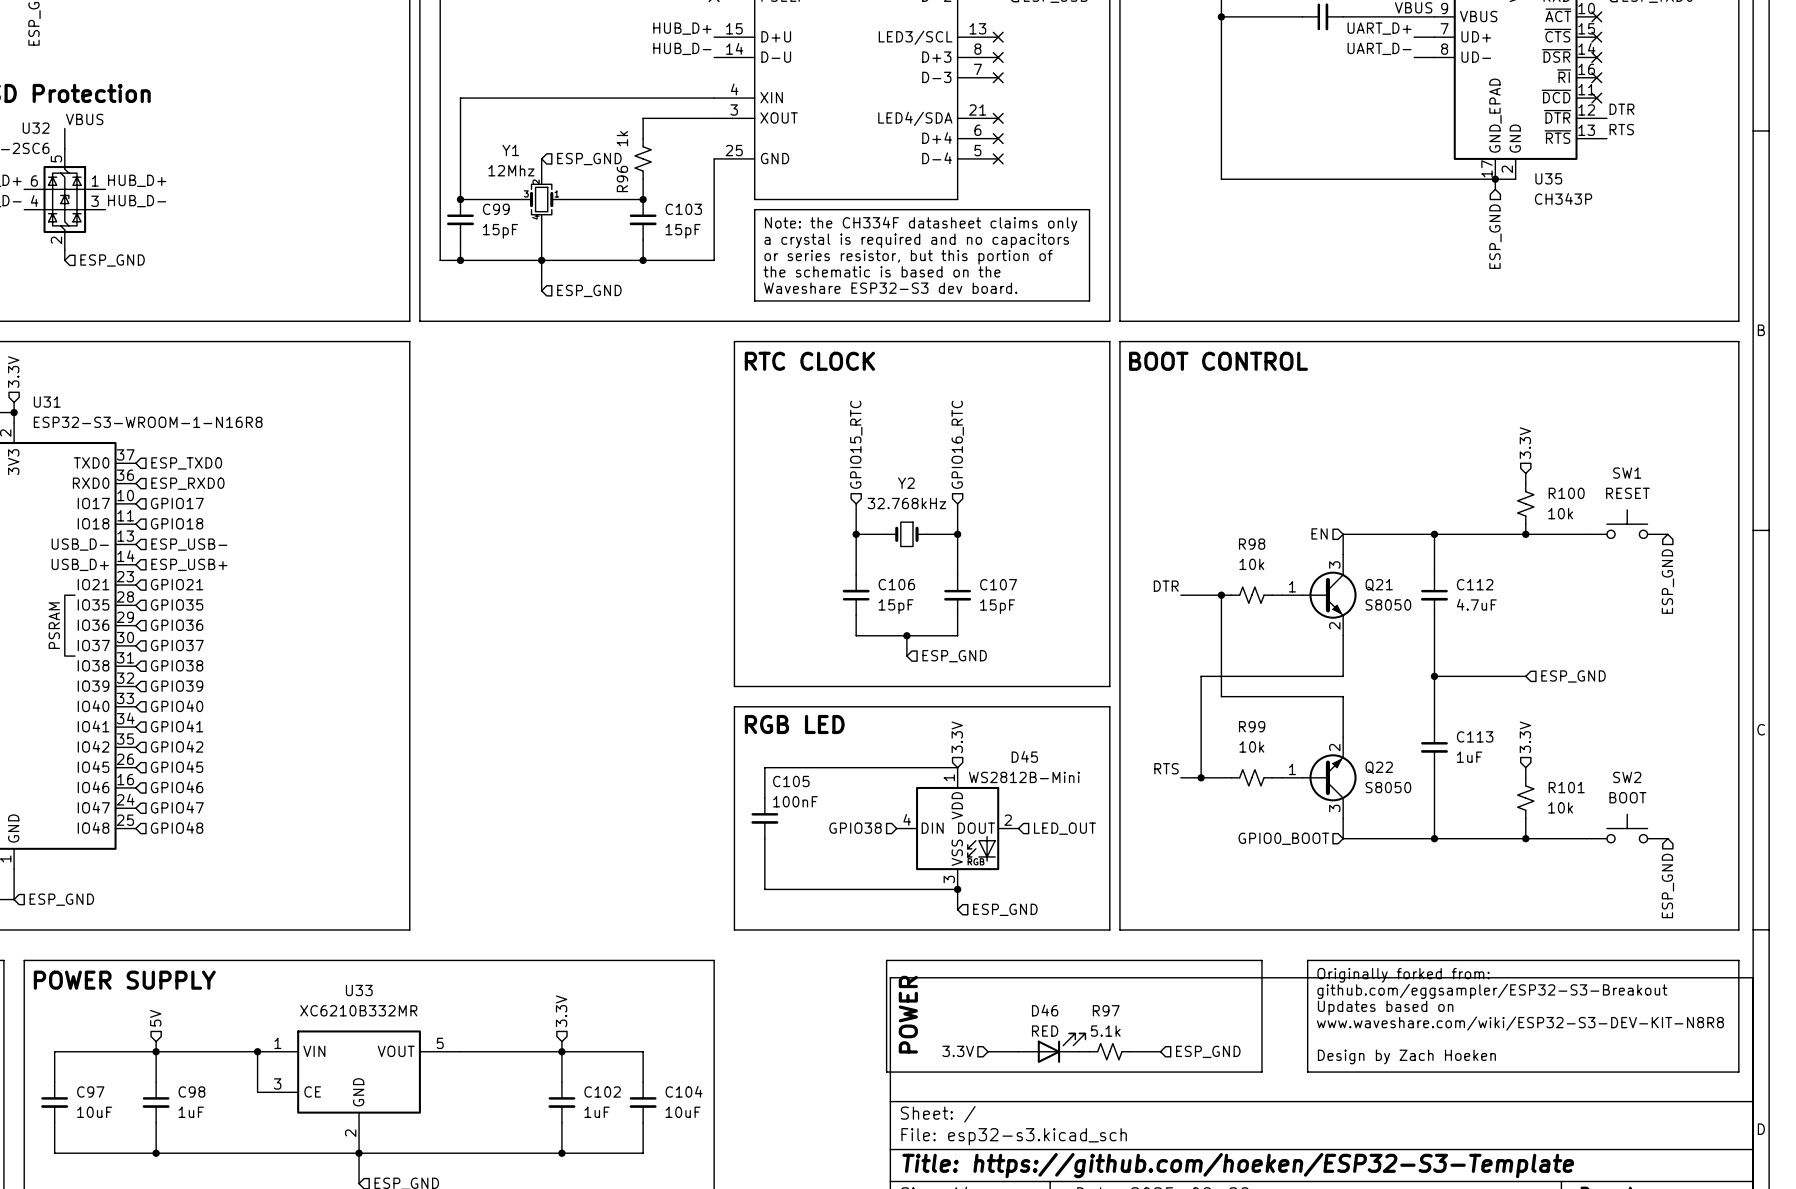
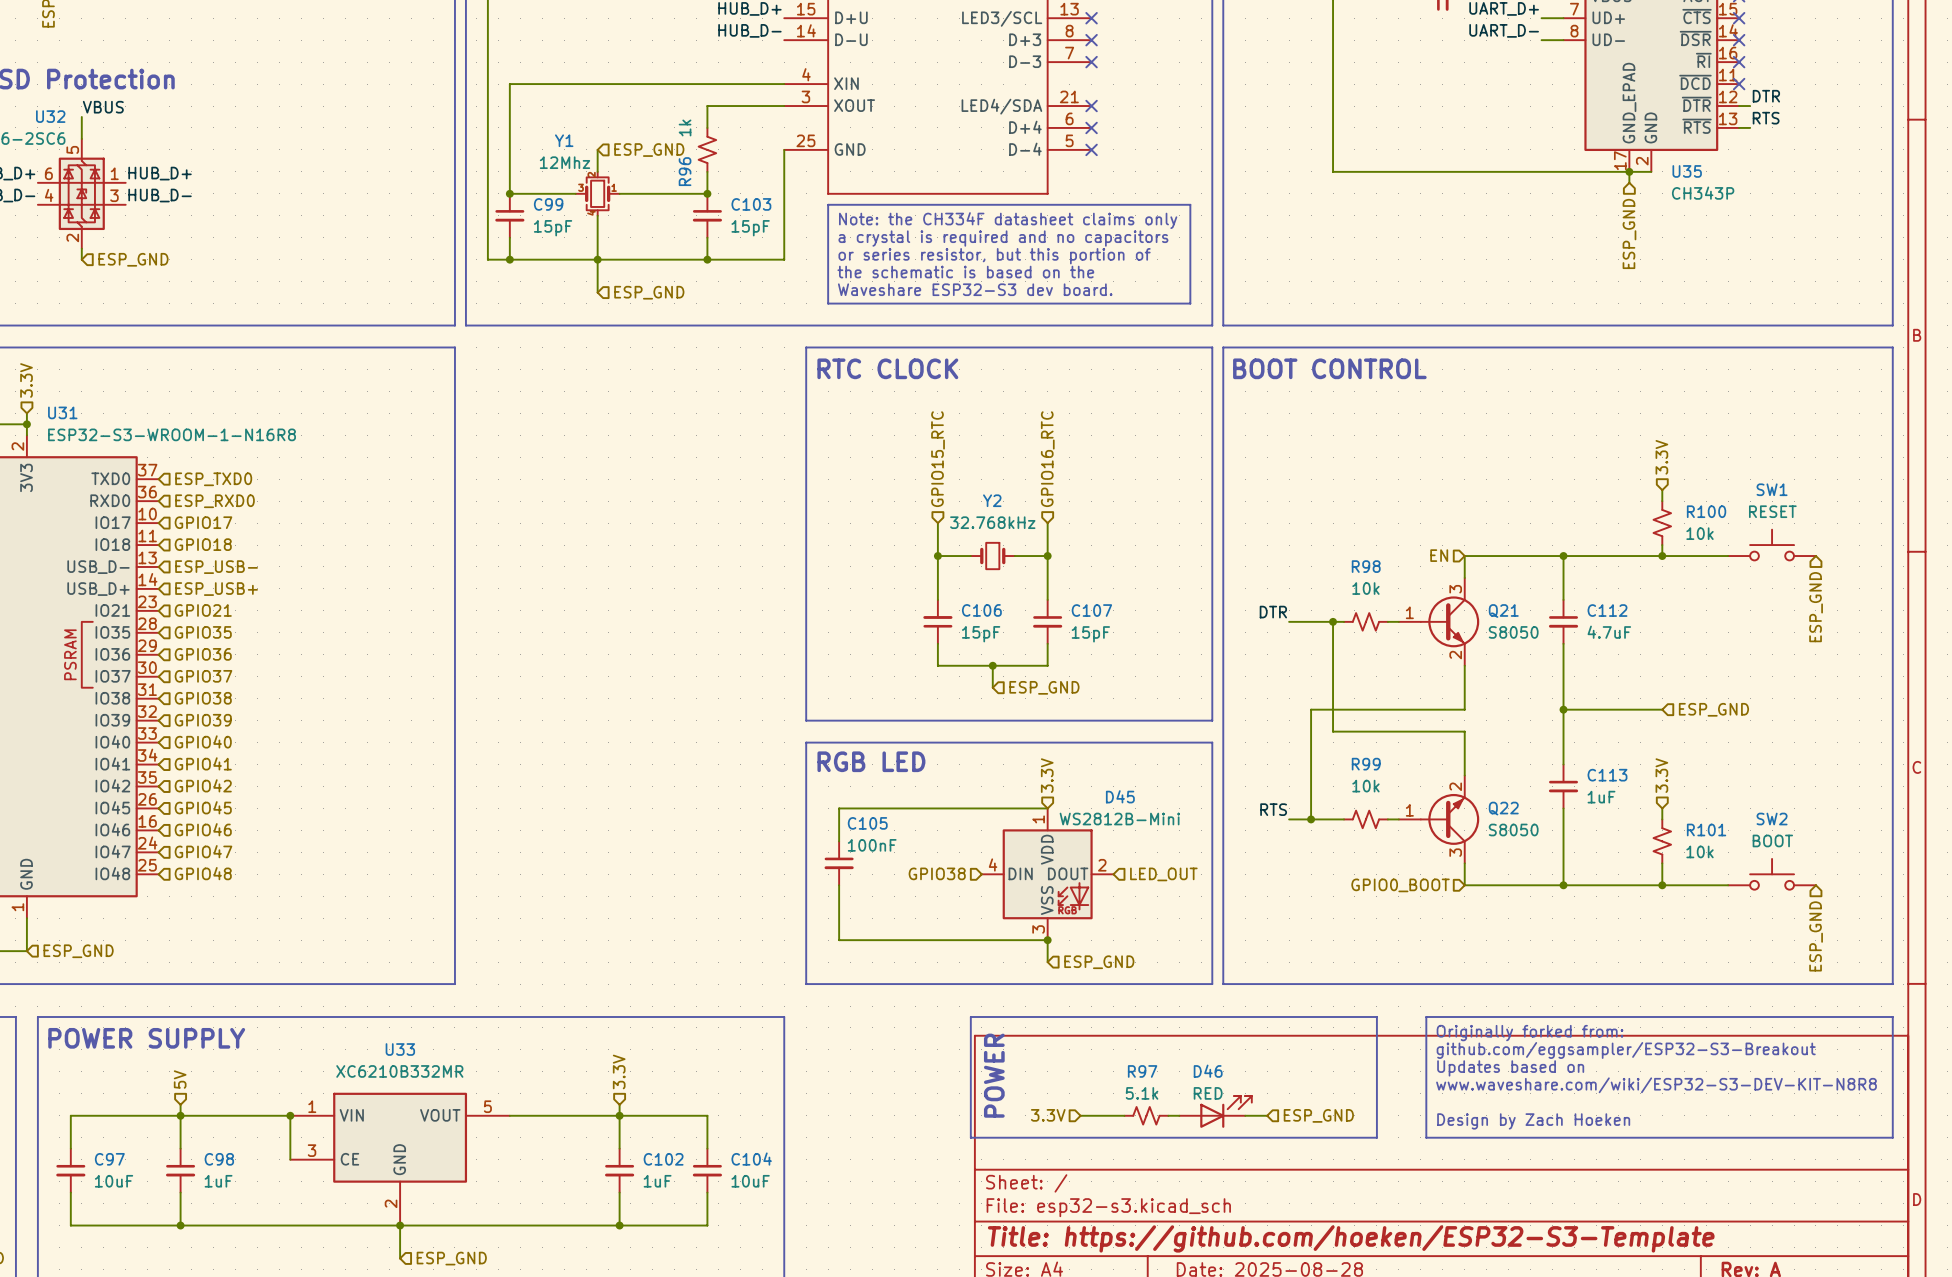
D46 position: (1051, 1048) -> (1215, 1111)
R97 position: (1109, 1051) -> (1146, 1115)

